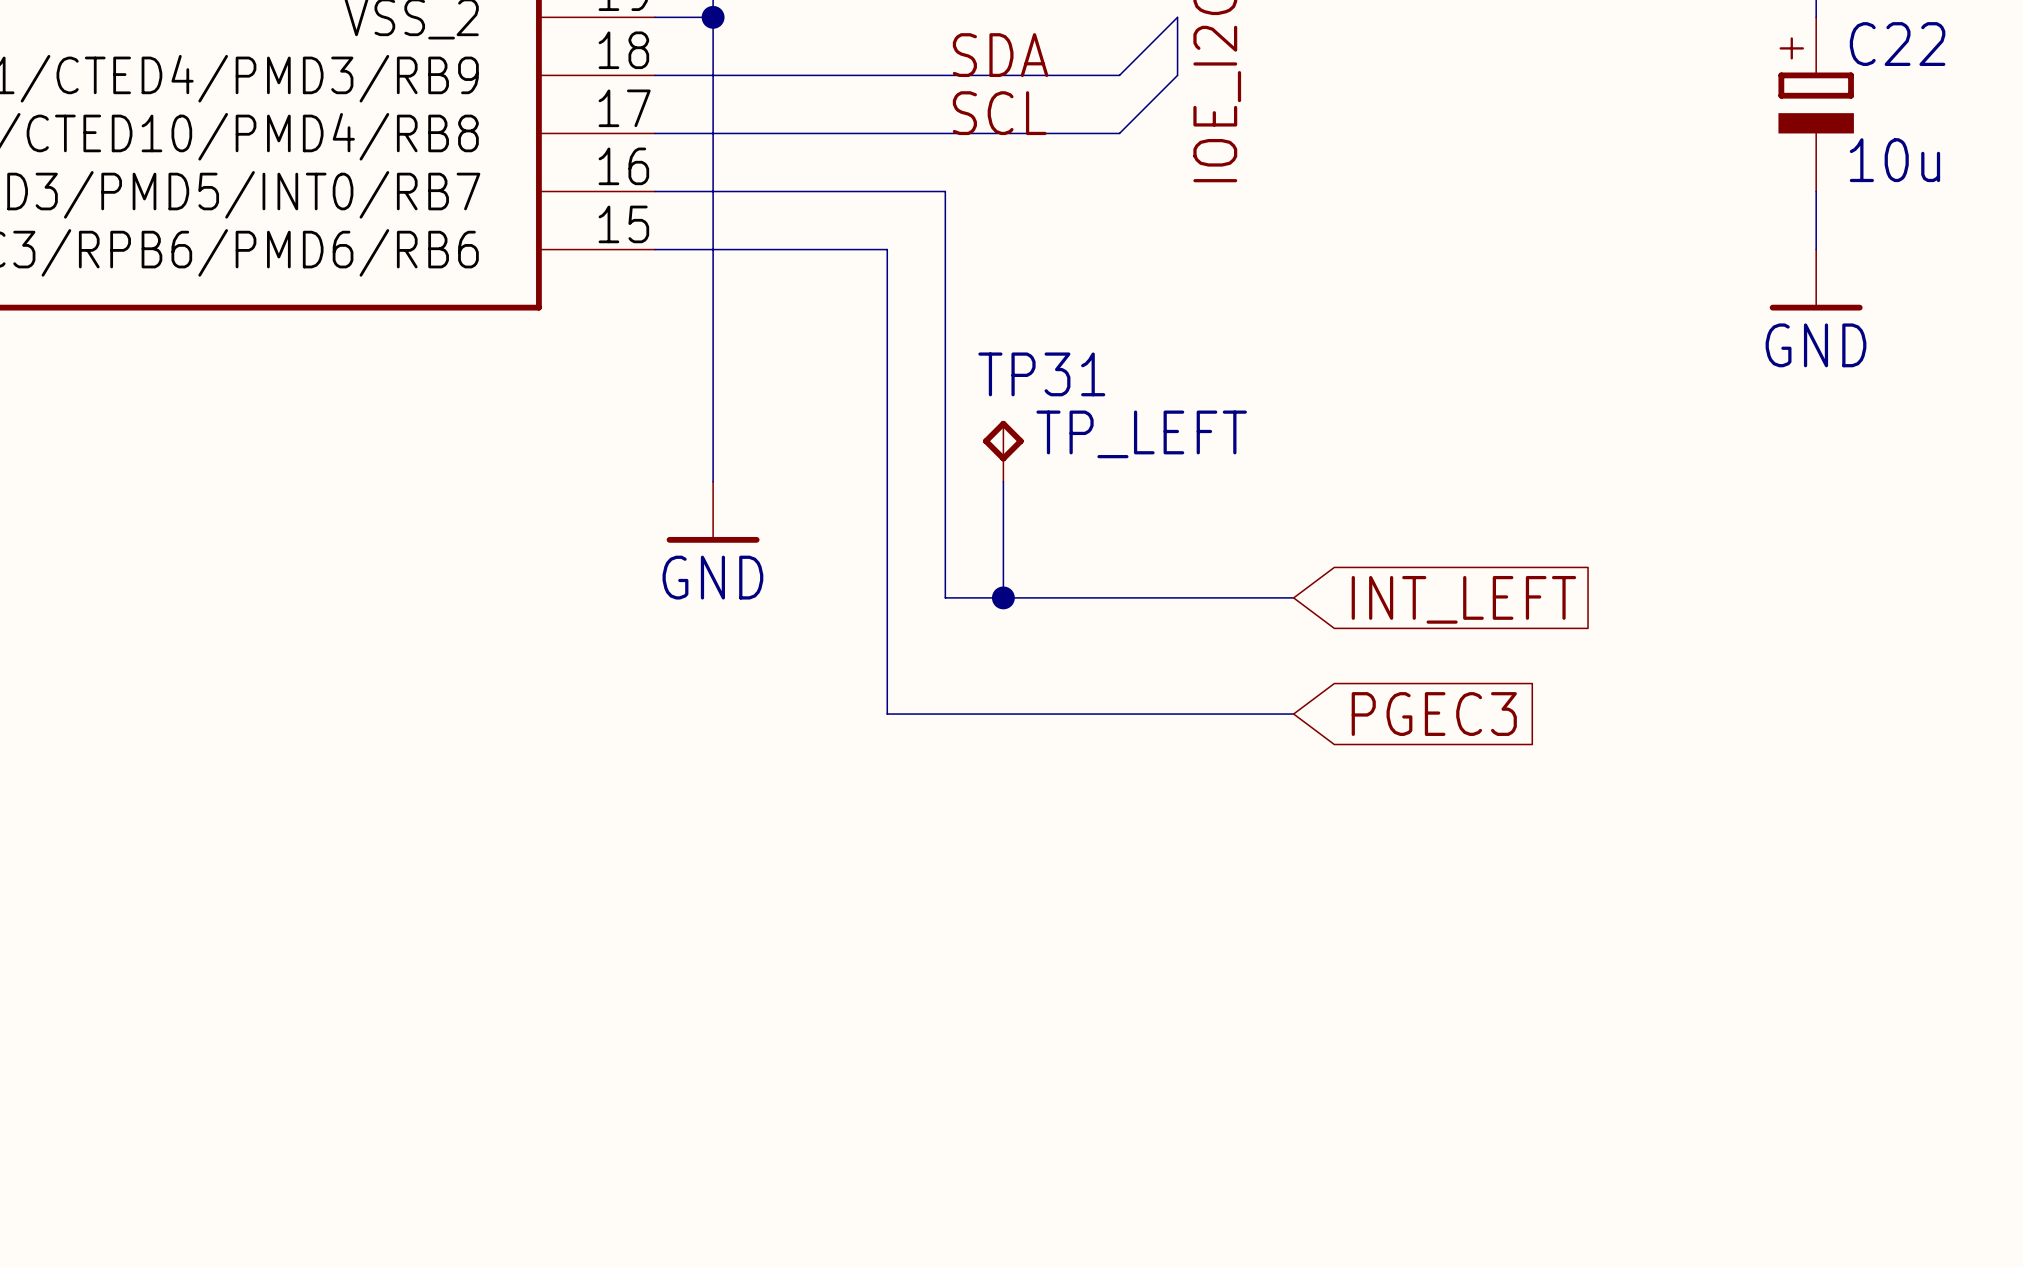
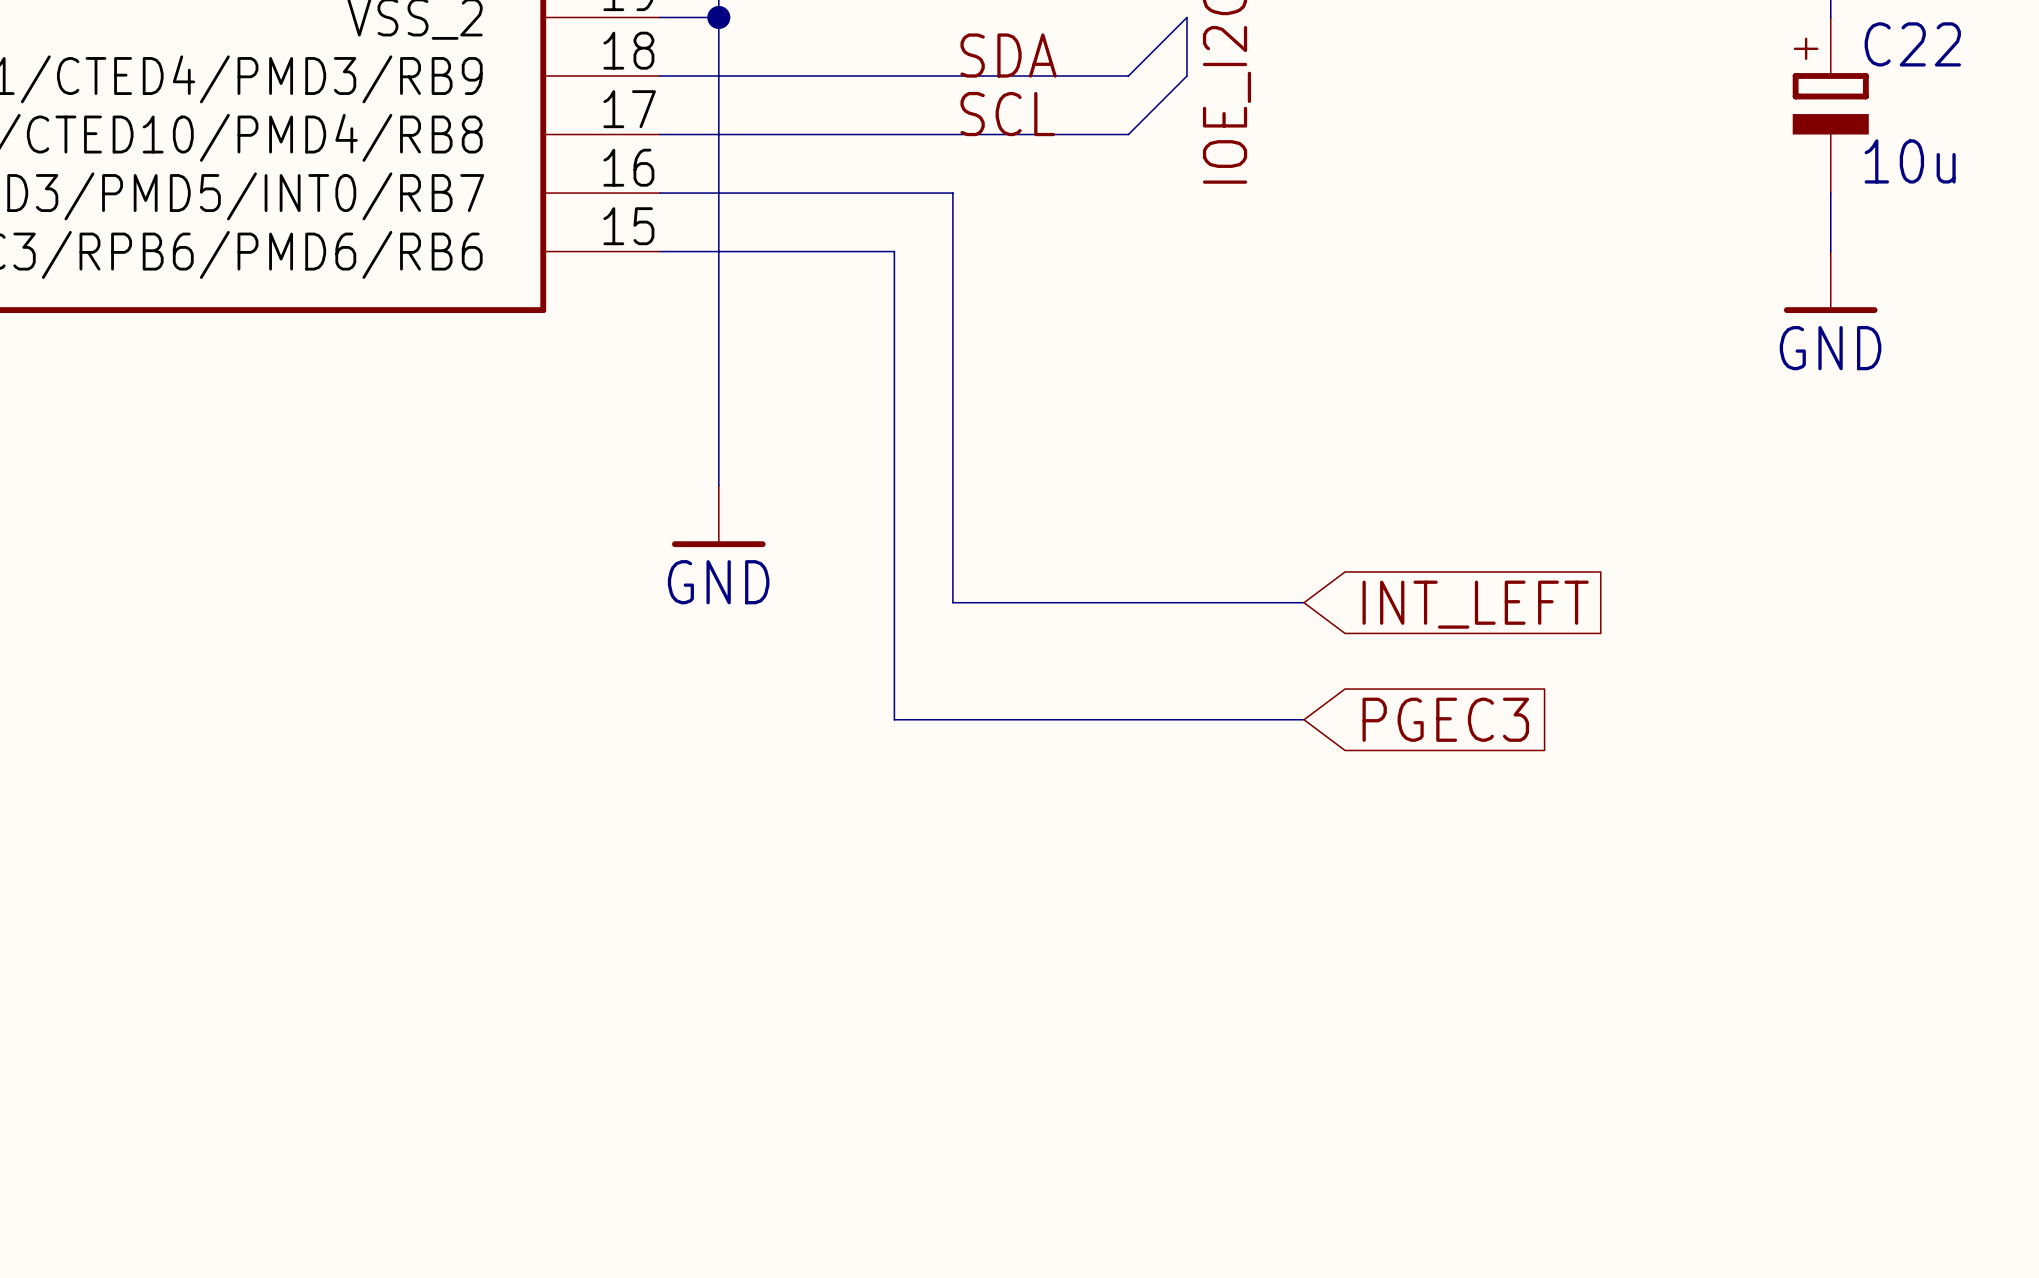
TP31: (1003, 451) -> none
wire: (1003, 481) (1003, 597) -> none
junction: (1003, 597) -> none

